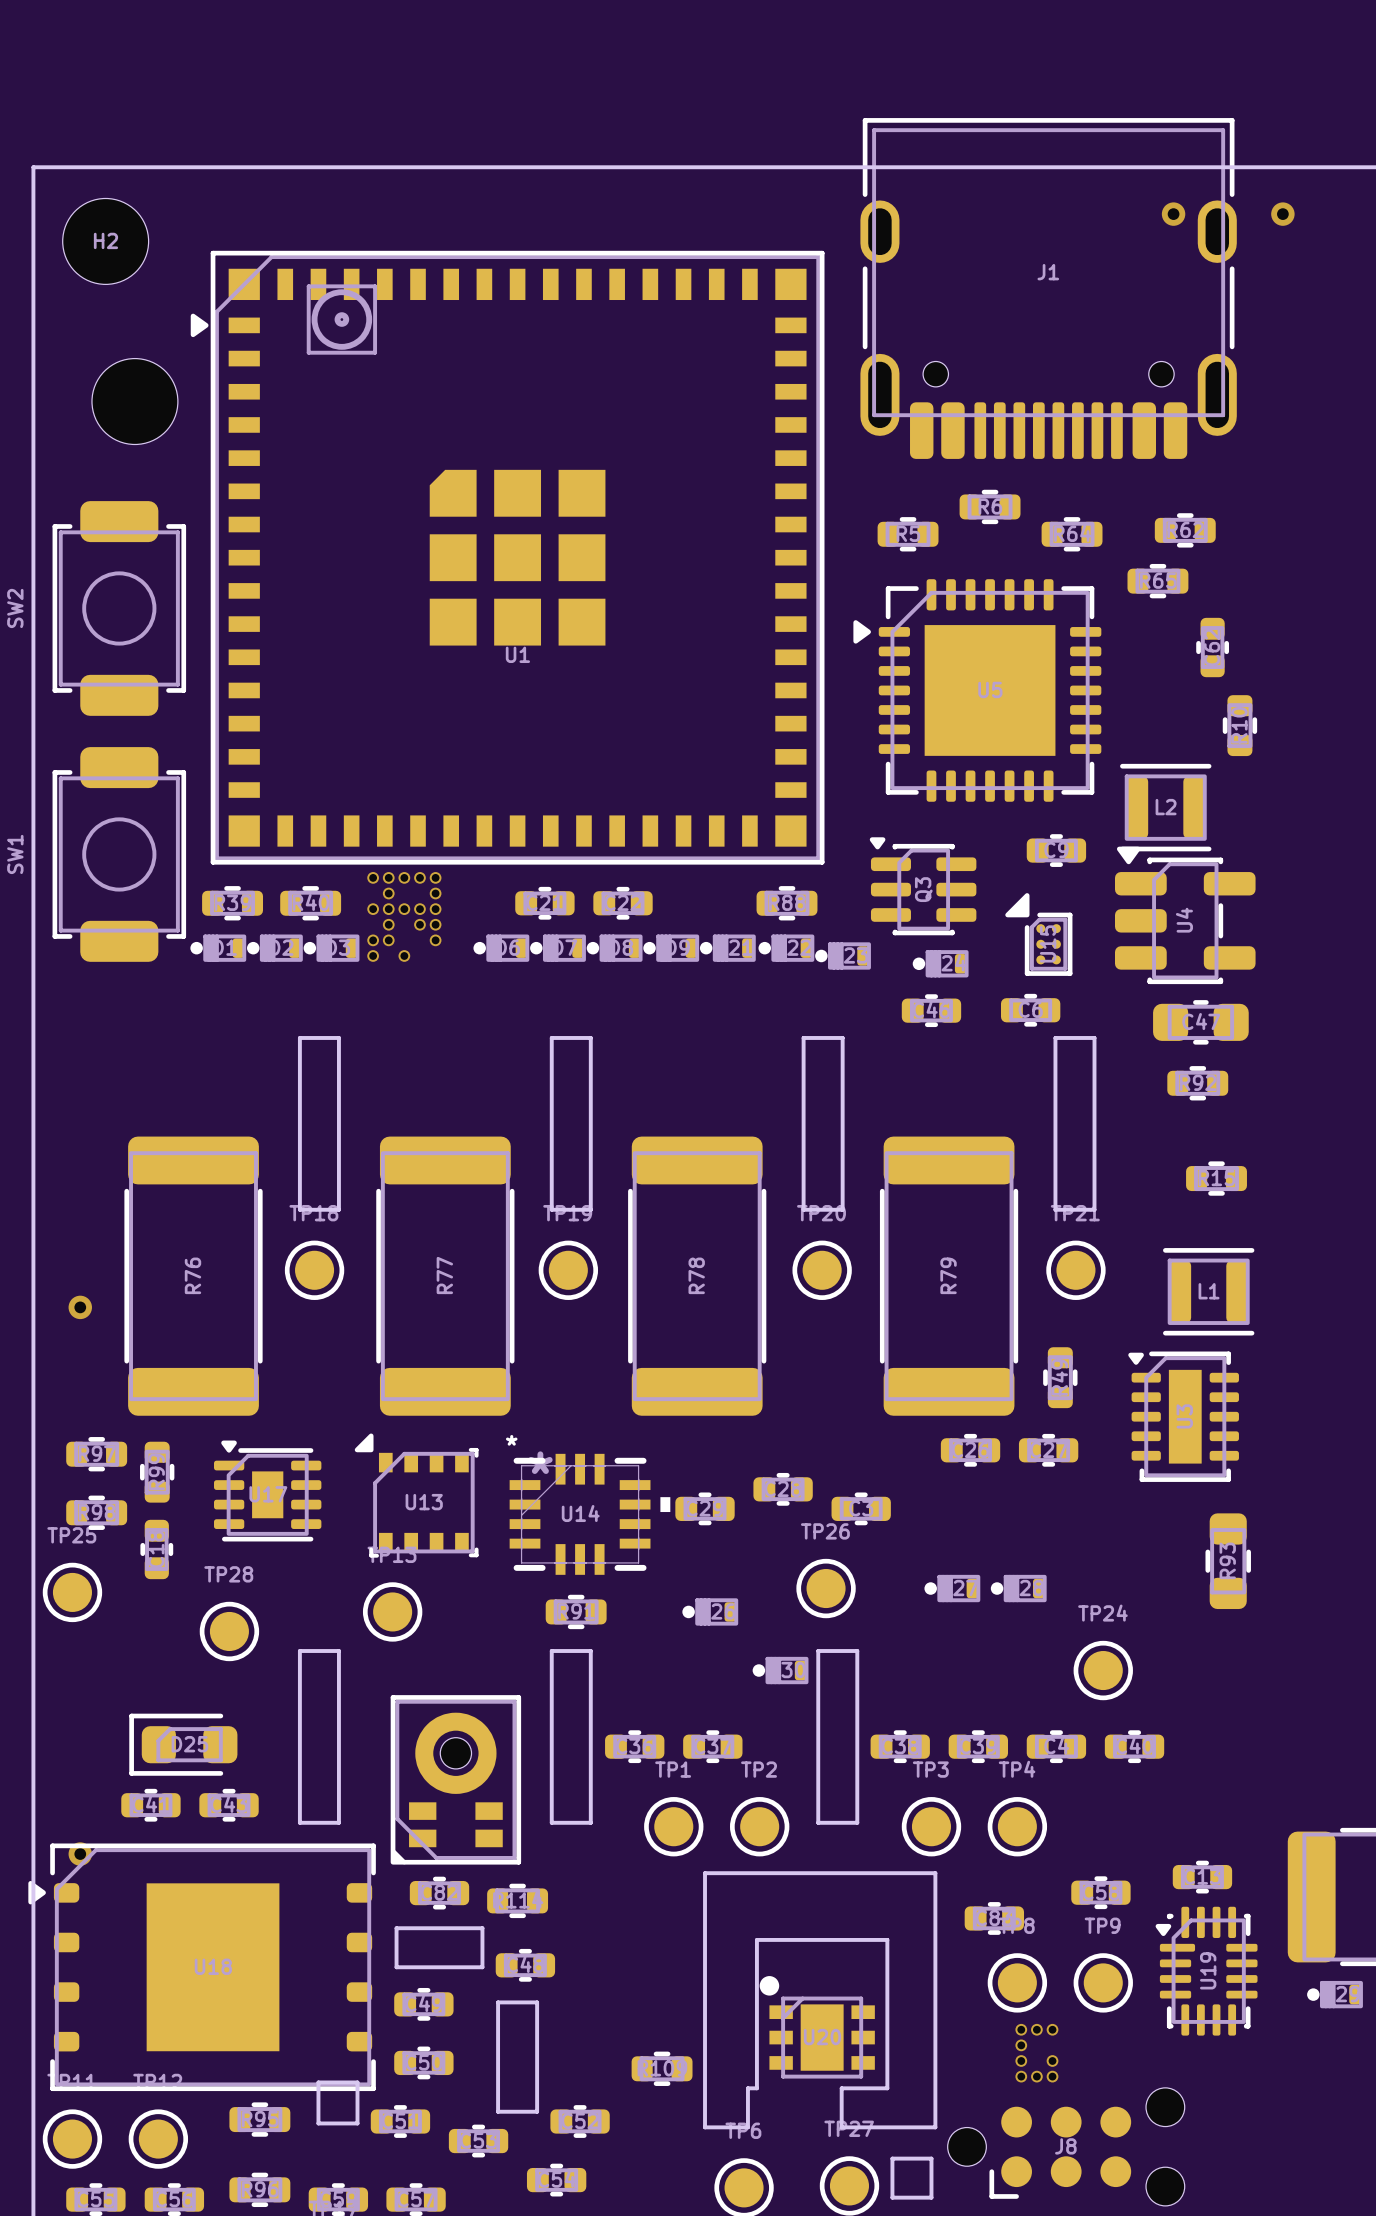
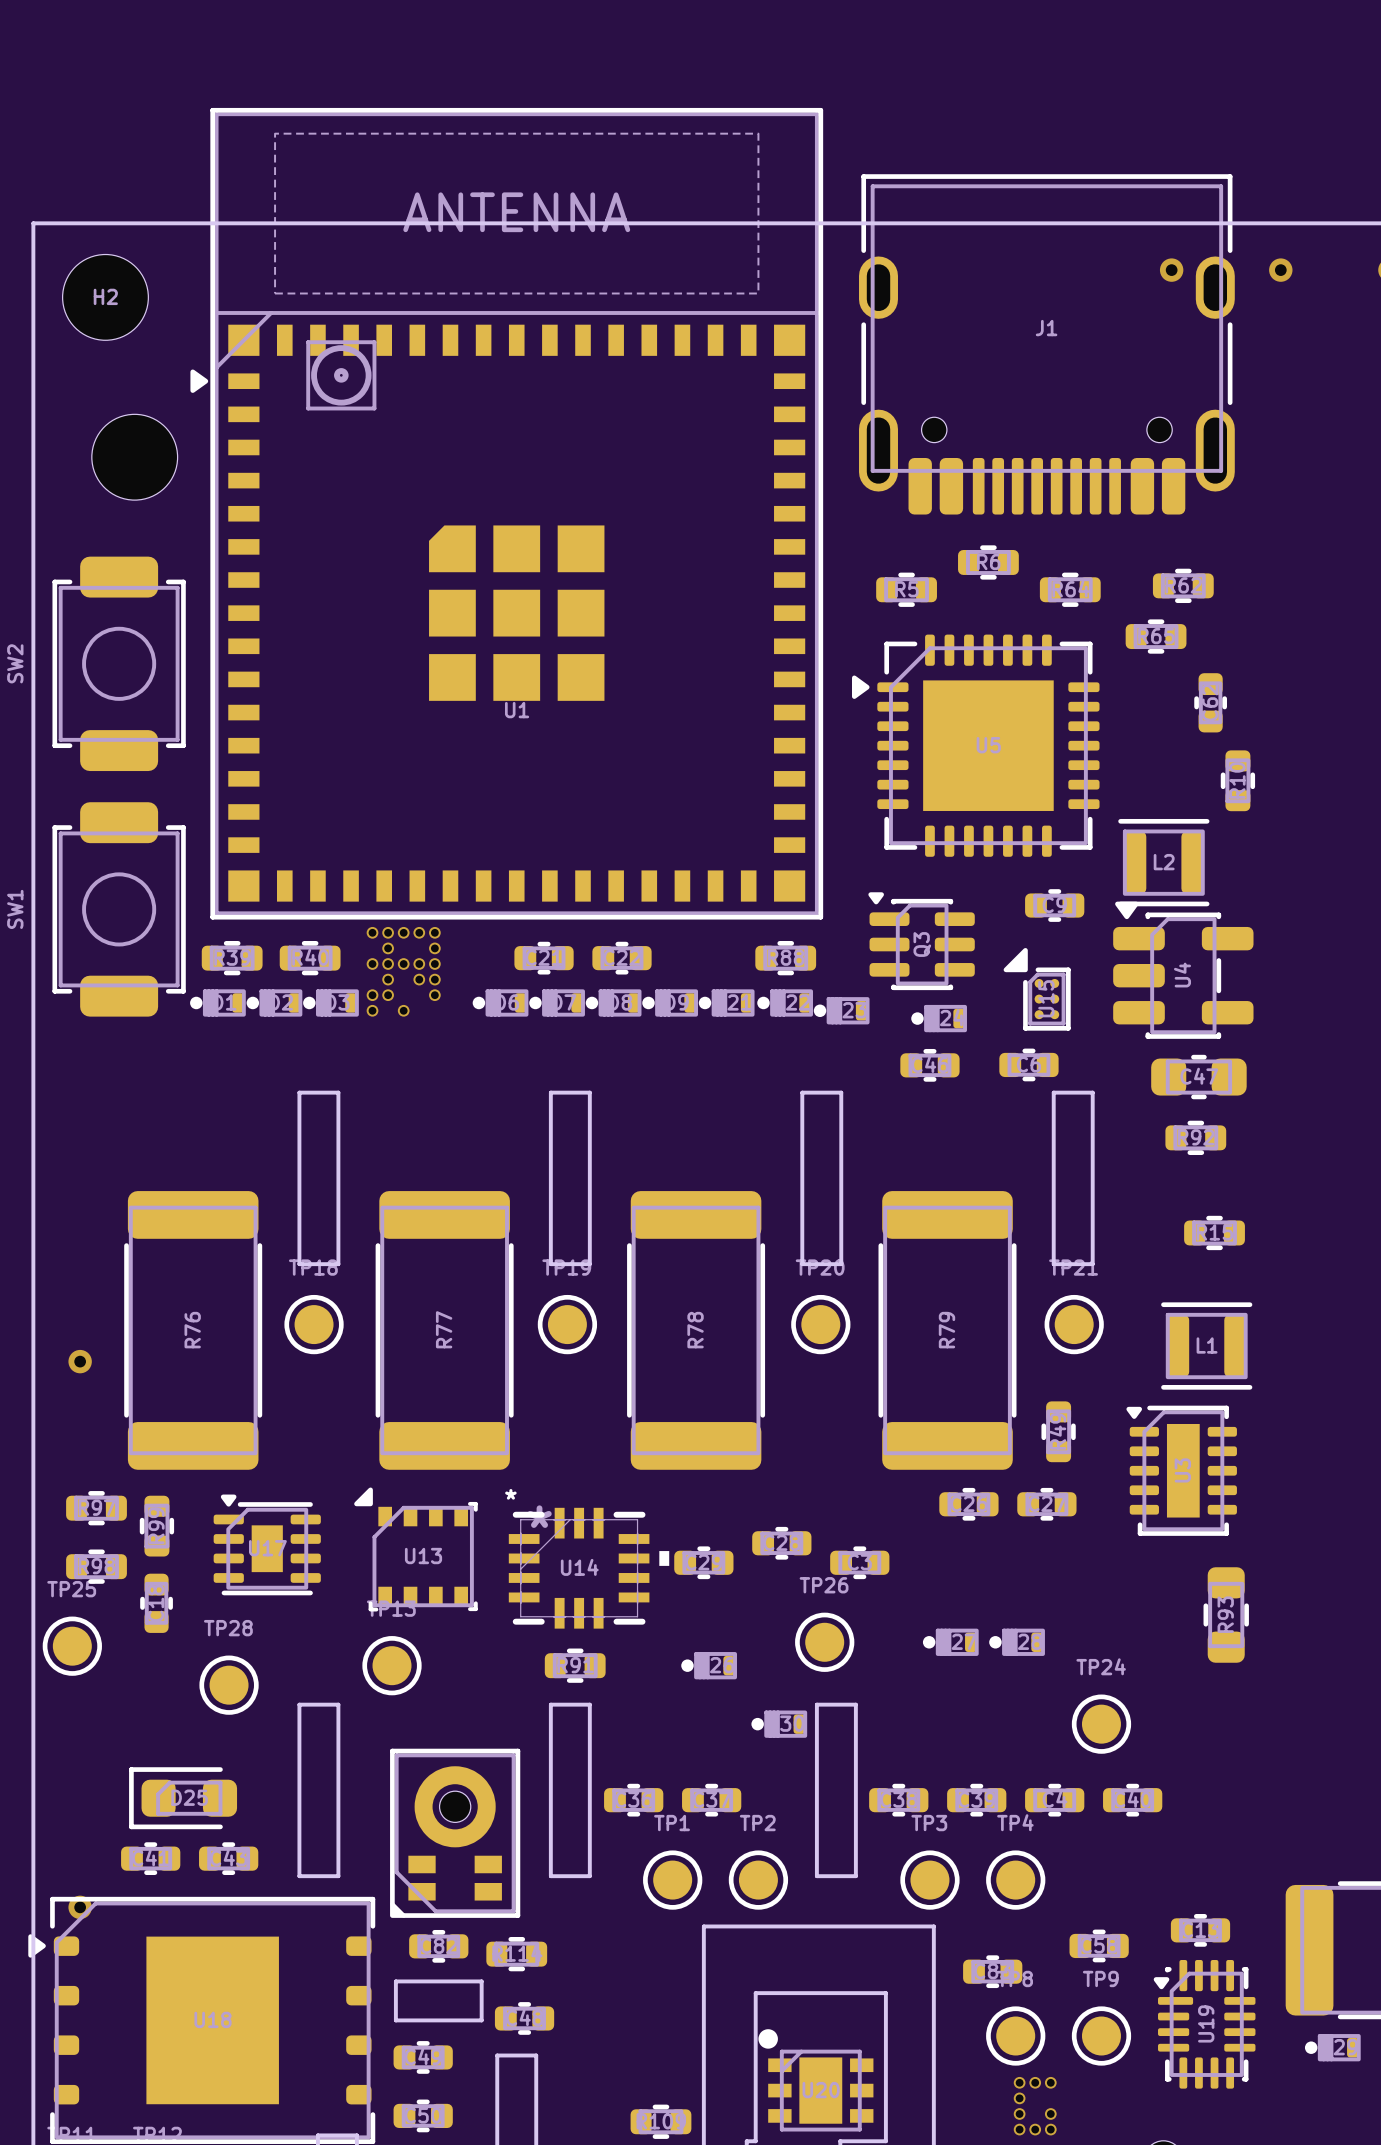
U1 footprint: [190, 250, 825, 865] -> [190, 107, 824, 920]

